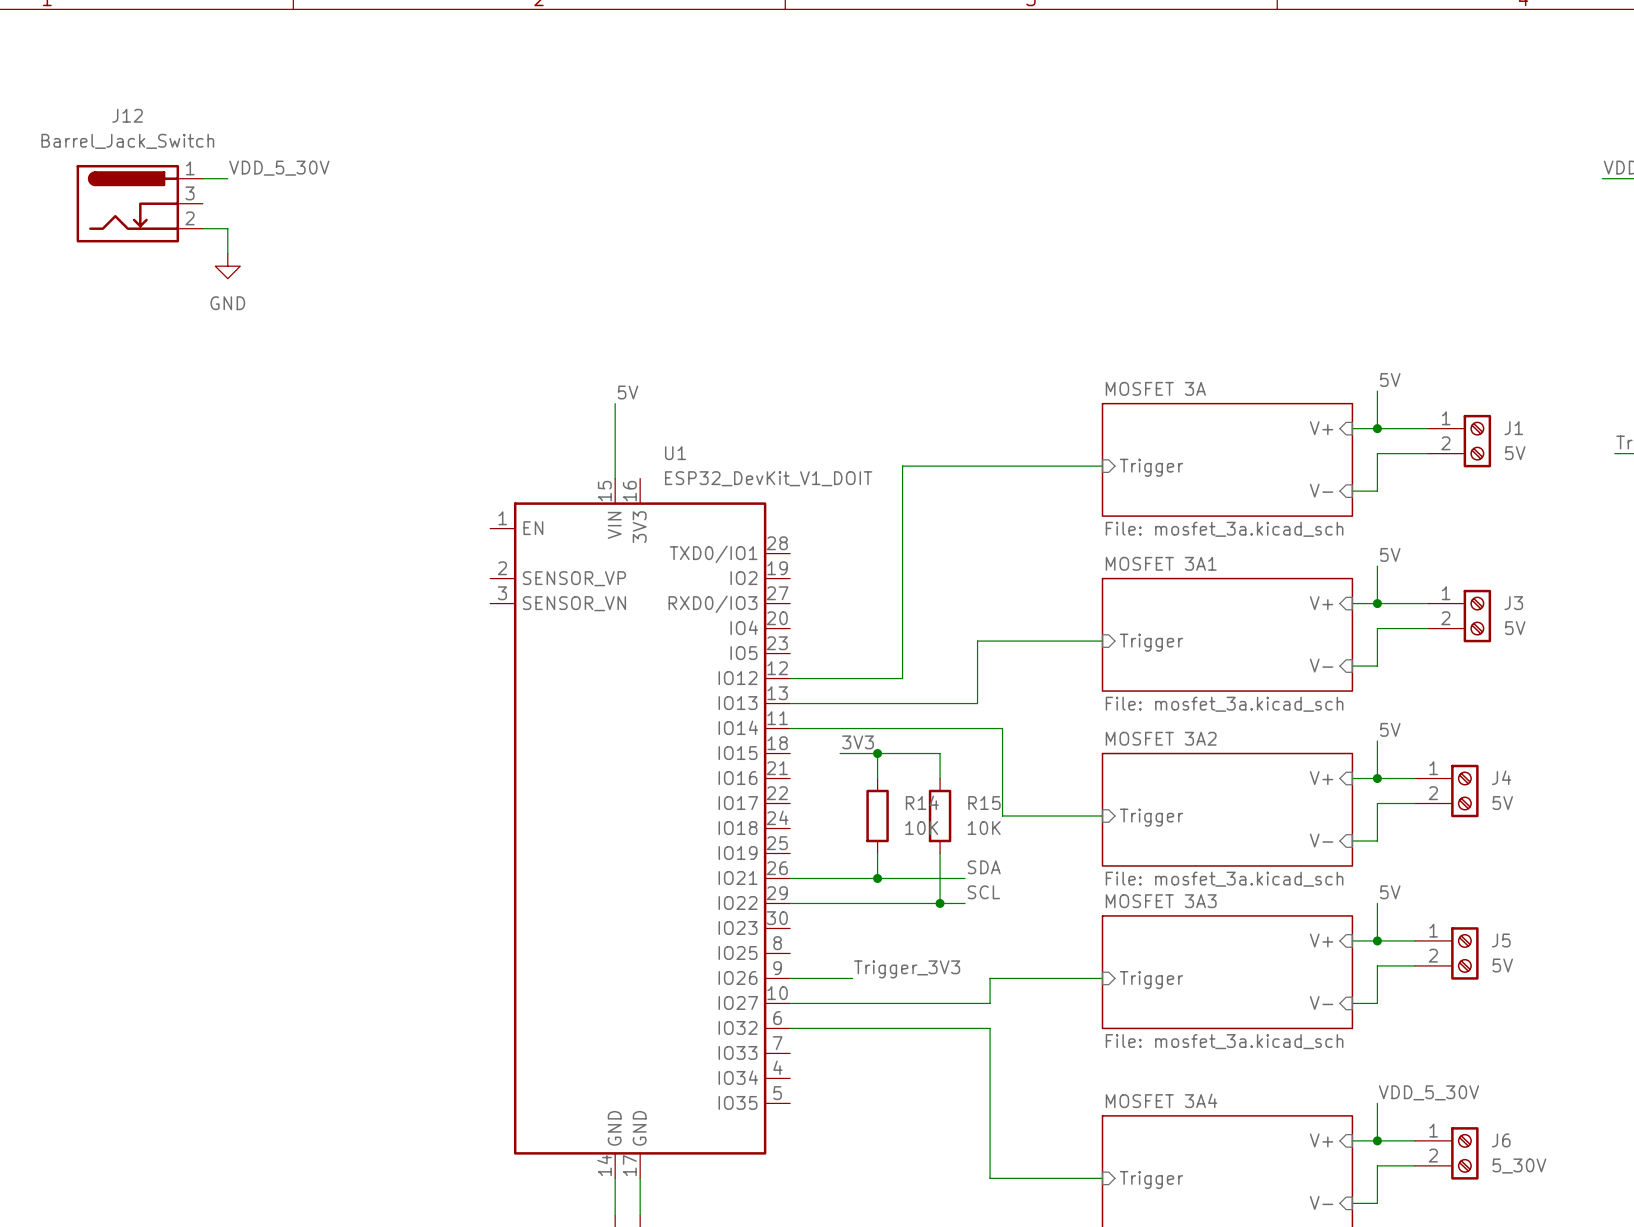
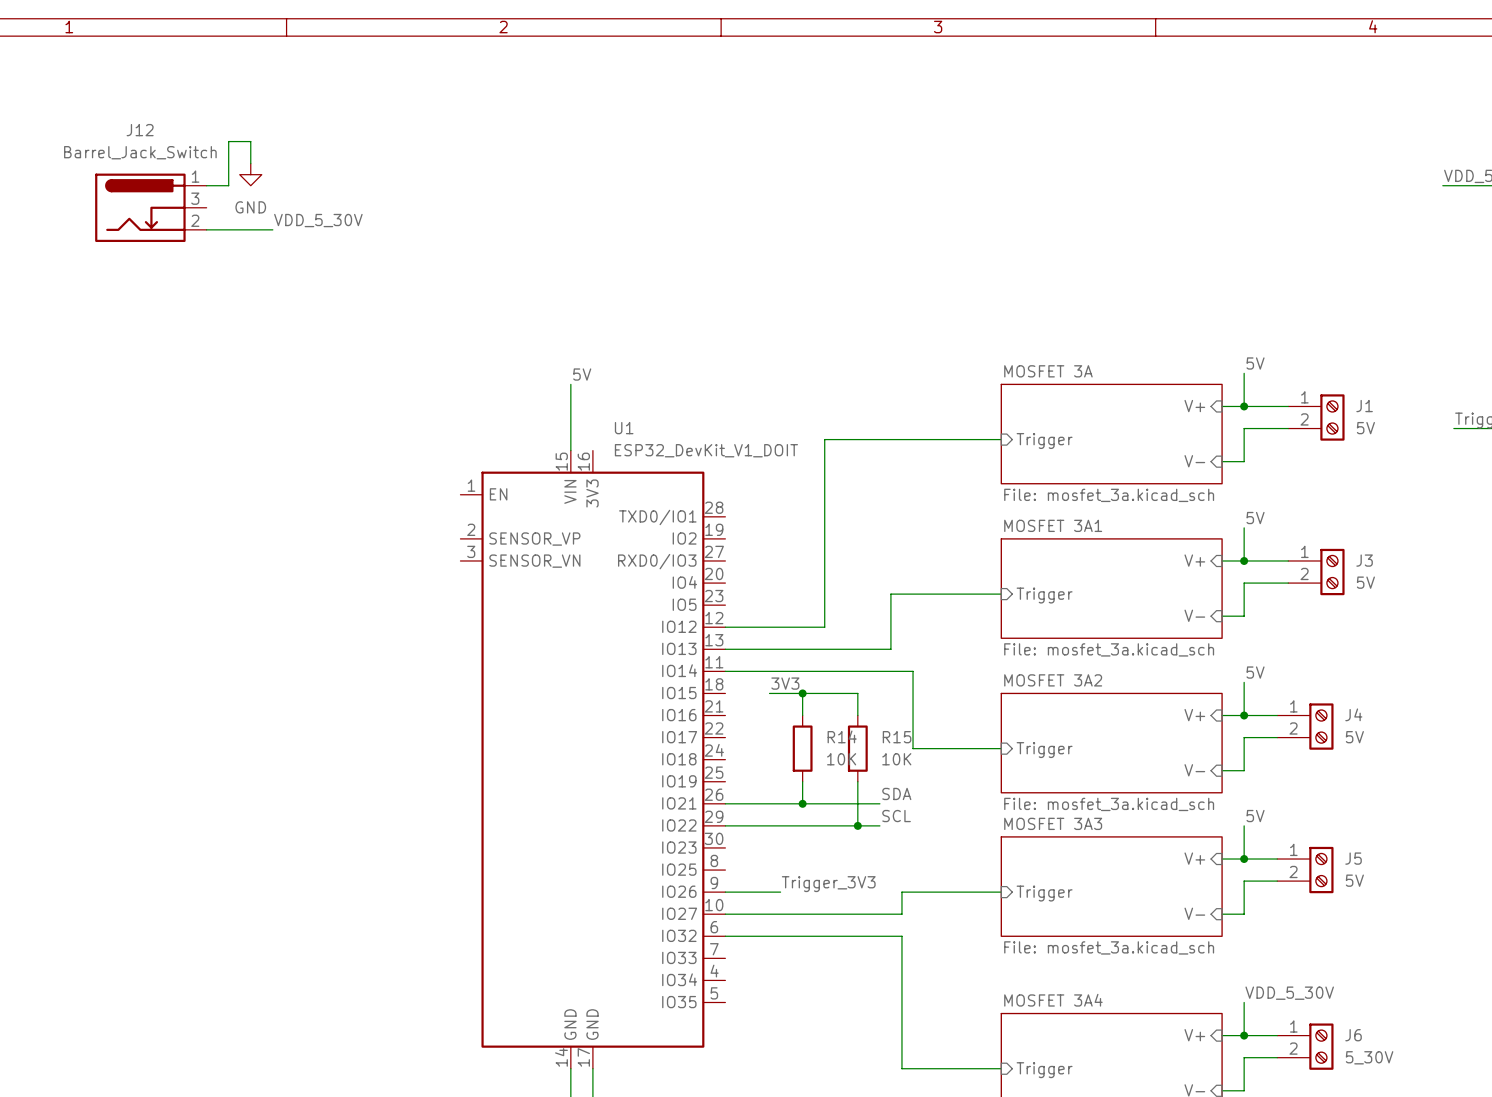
wire: none -> (250, 163) (250, 141) (228, 141) (228, 185)
label position: VDD_5_30V (279, 168) -> VDD_5_30V (318, 220)
wire: (227, 228) (227, 253) -> (228, 229) (272, 229)
power symbol position: GND (227, 266) -> GND (250, 174)

